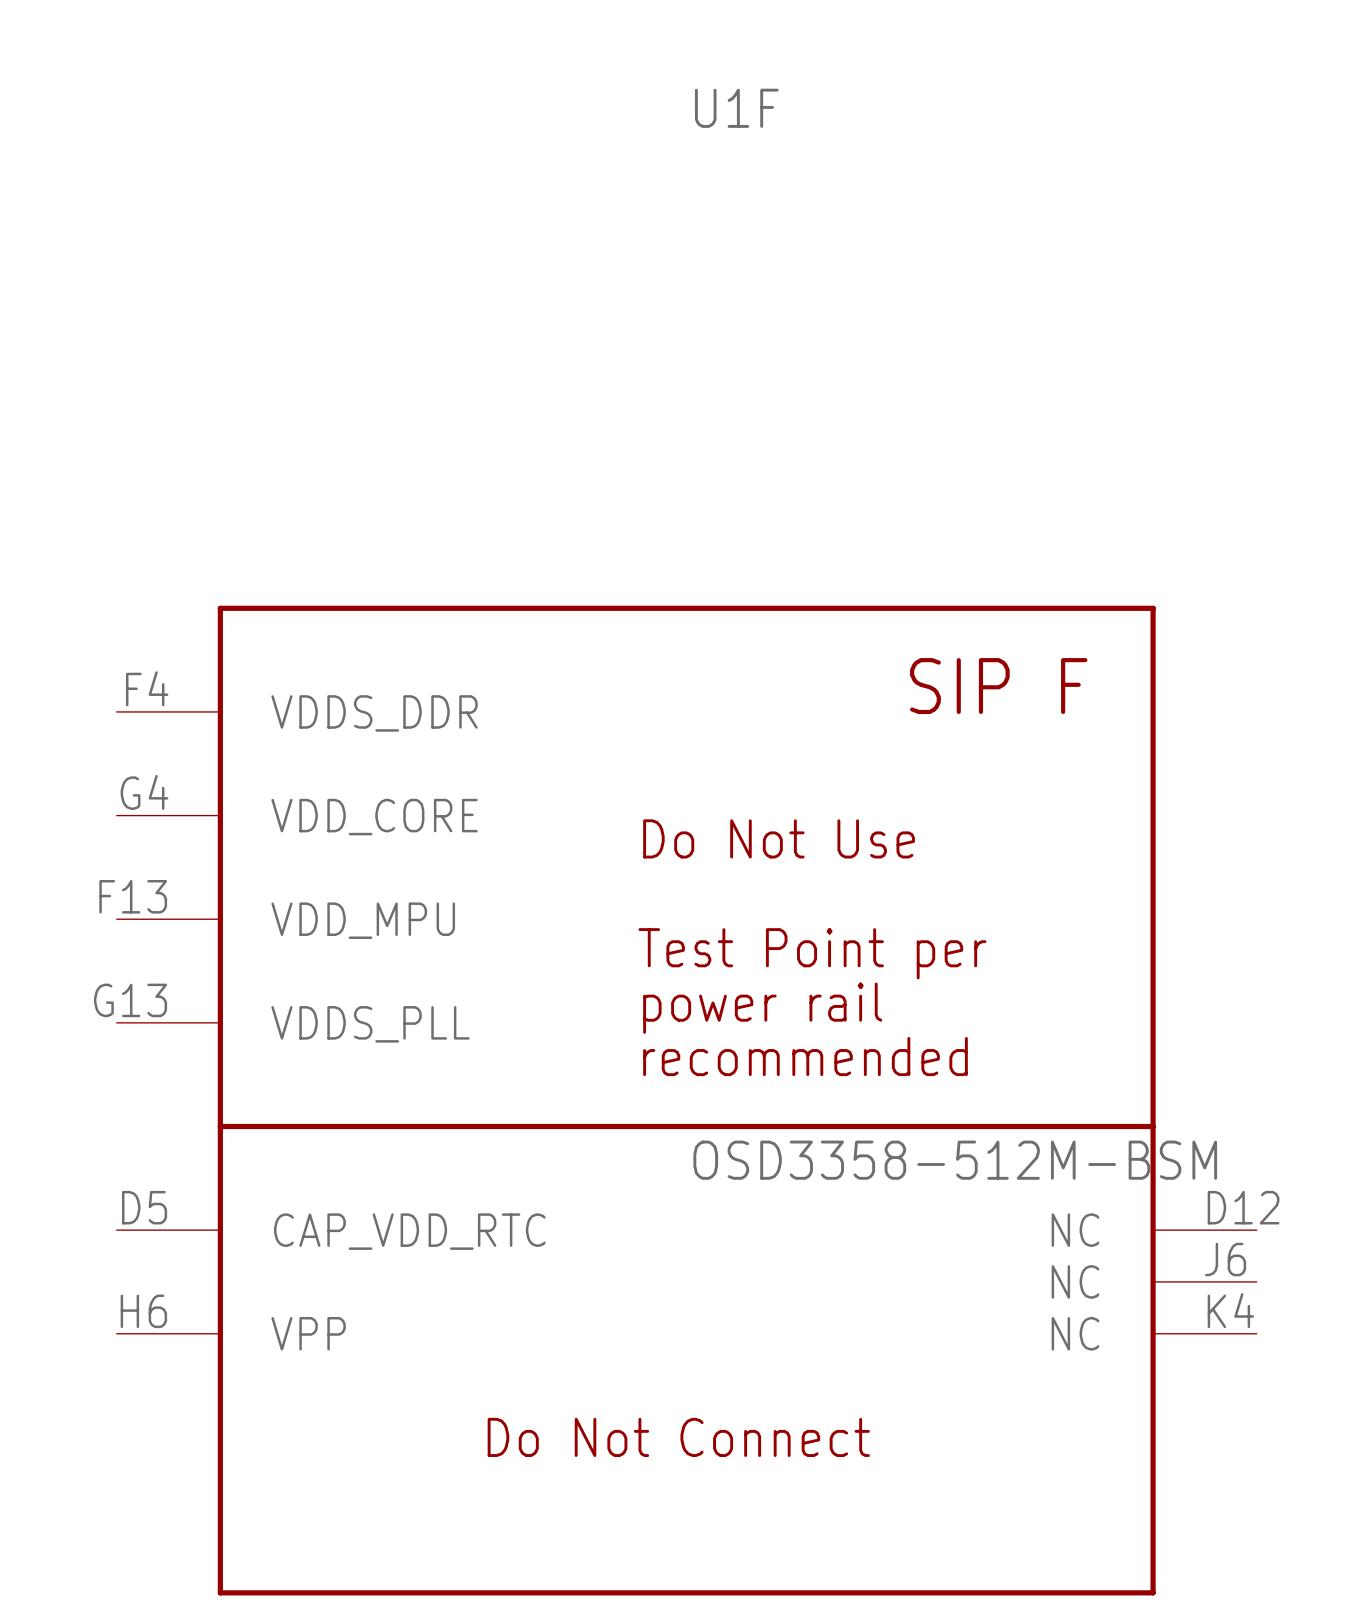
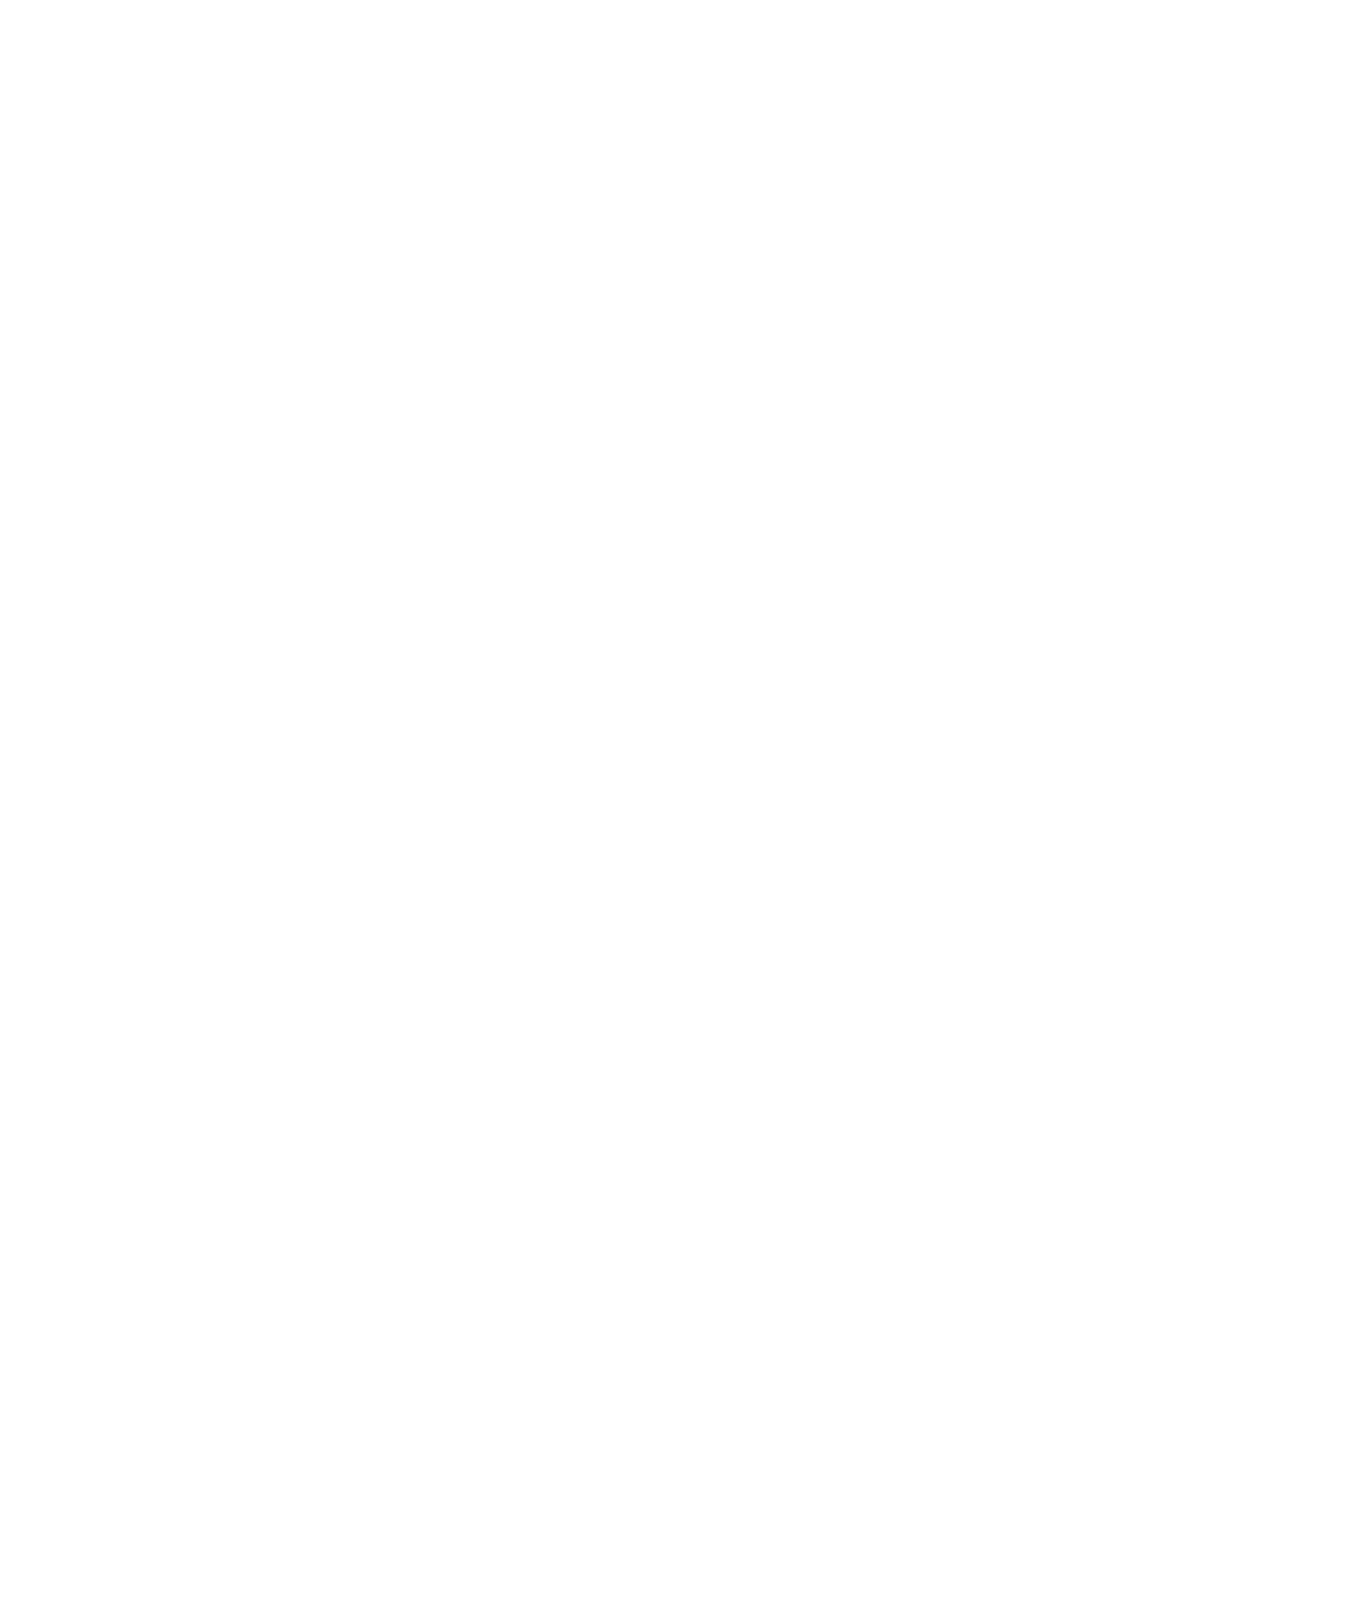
U1F: OSD3358-512M-BSM (686, 1100) -> none

